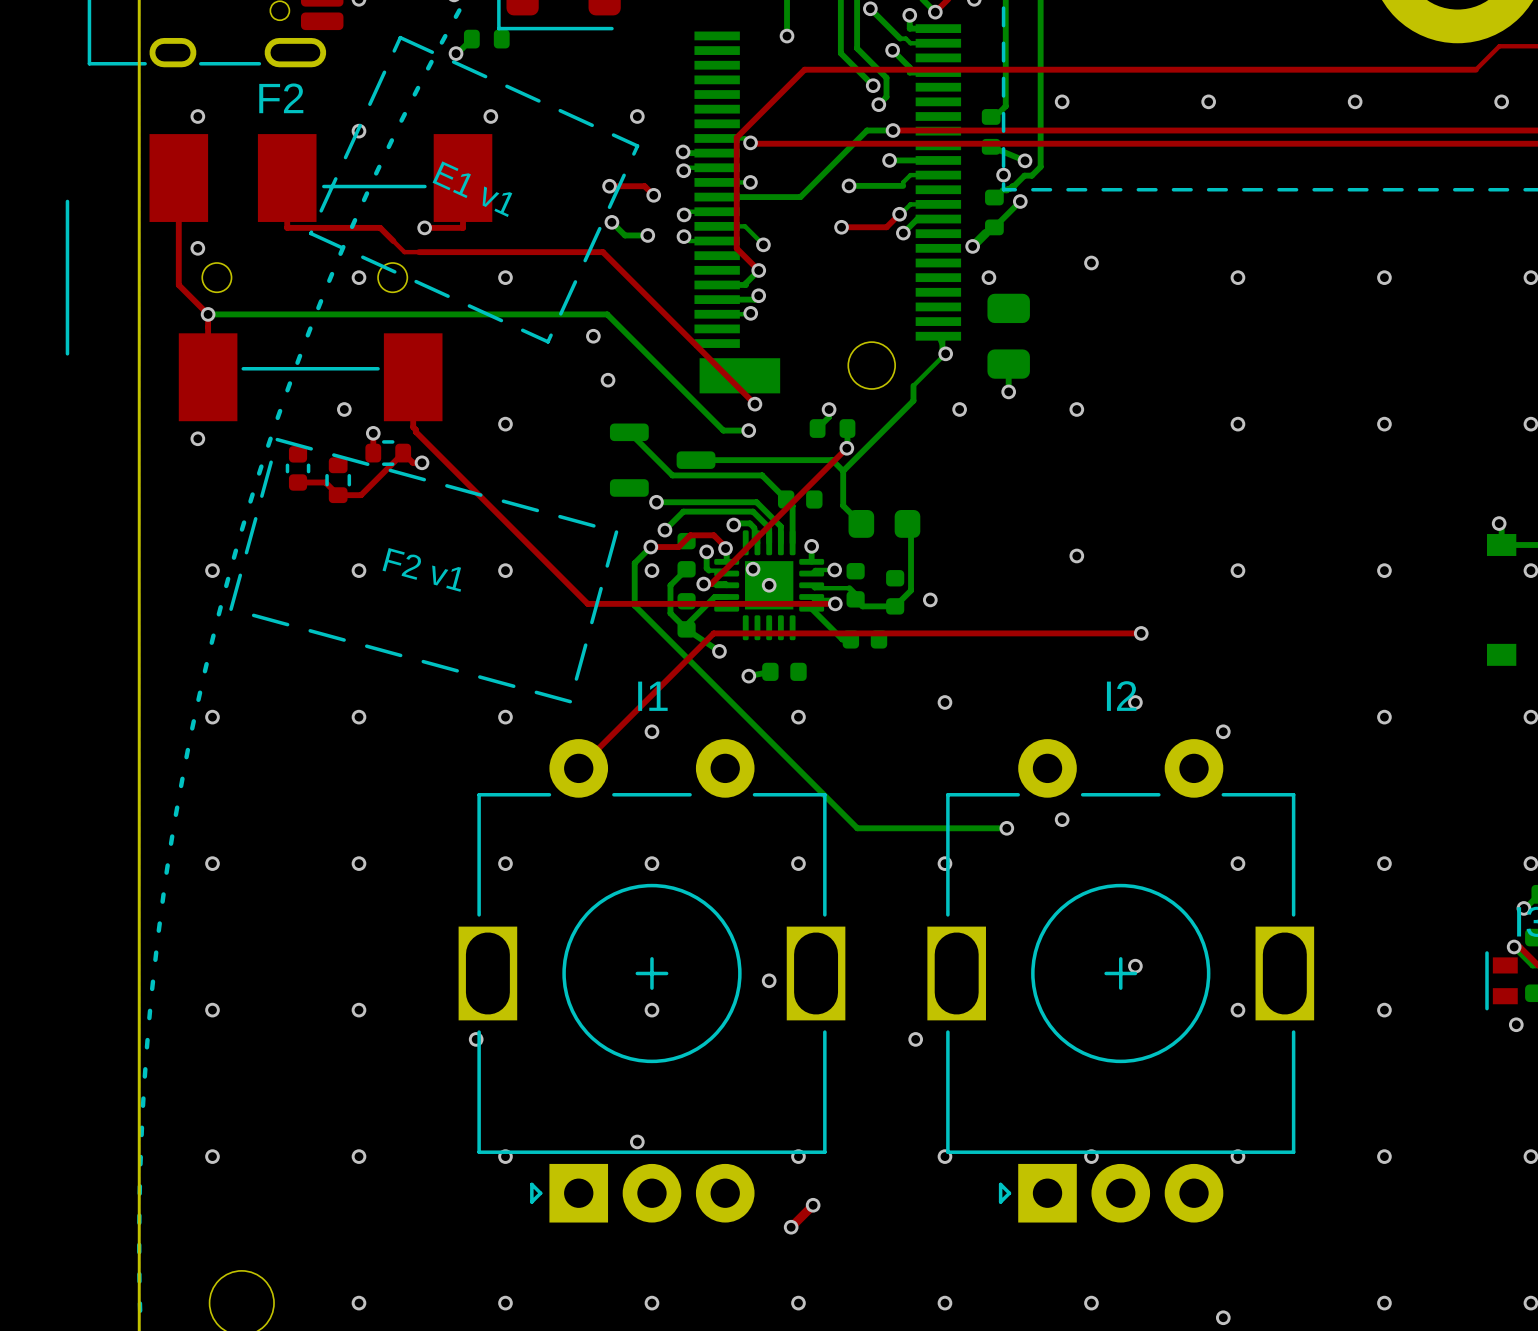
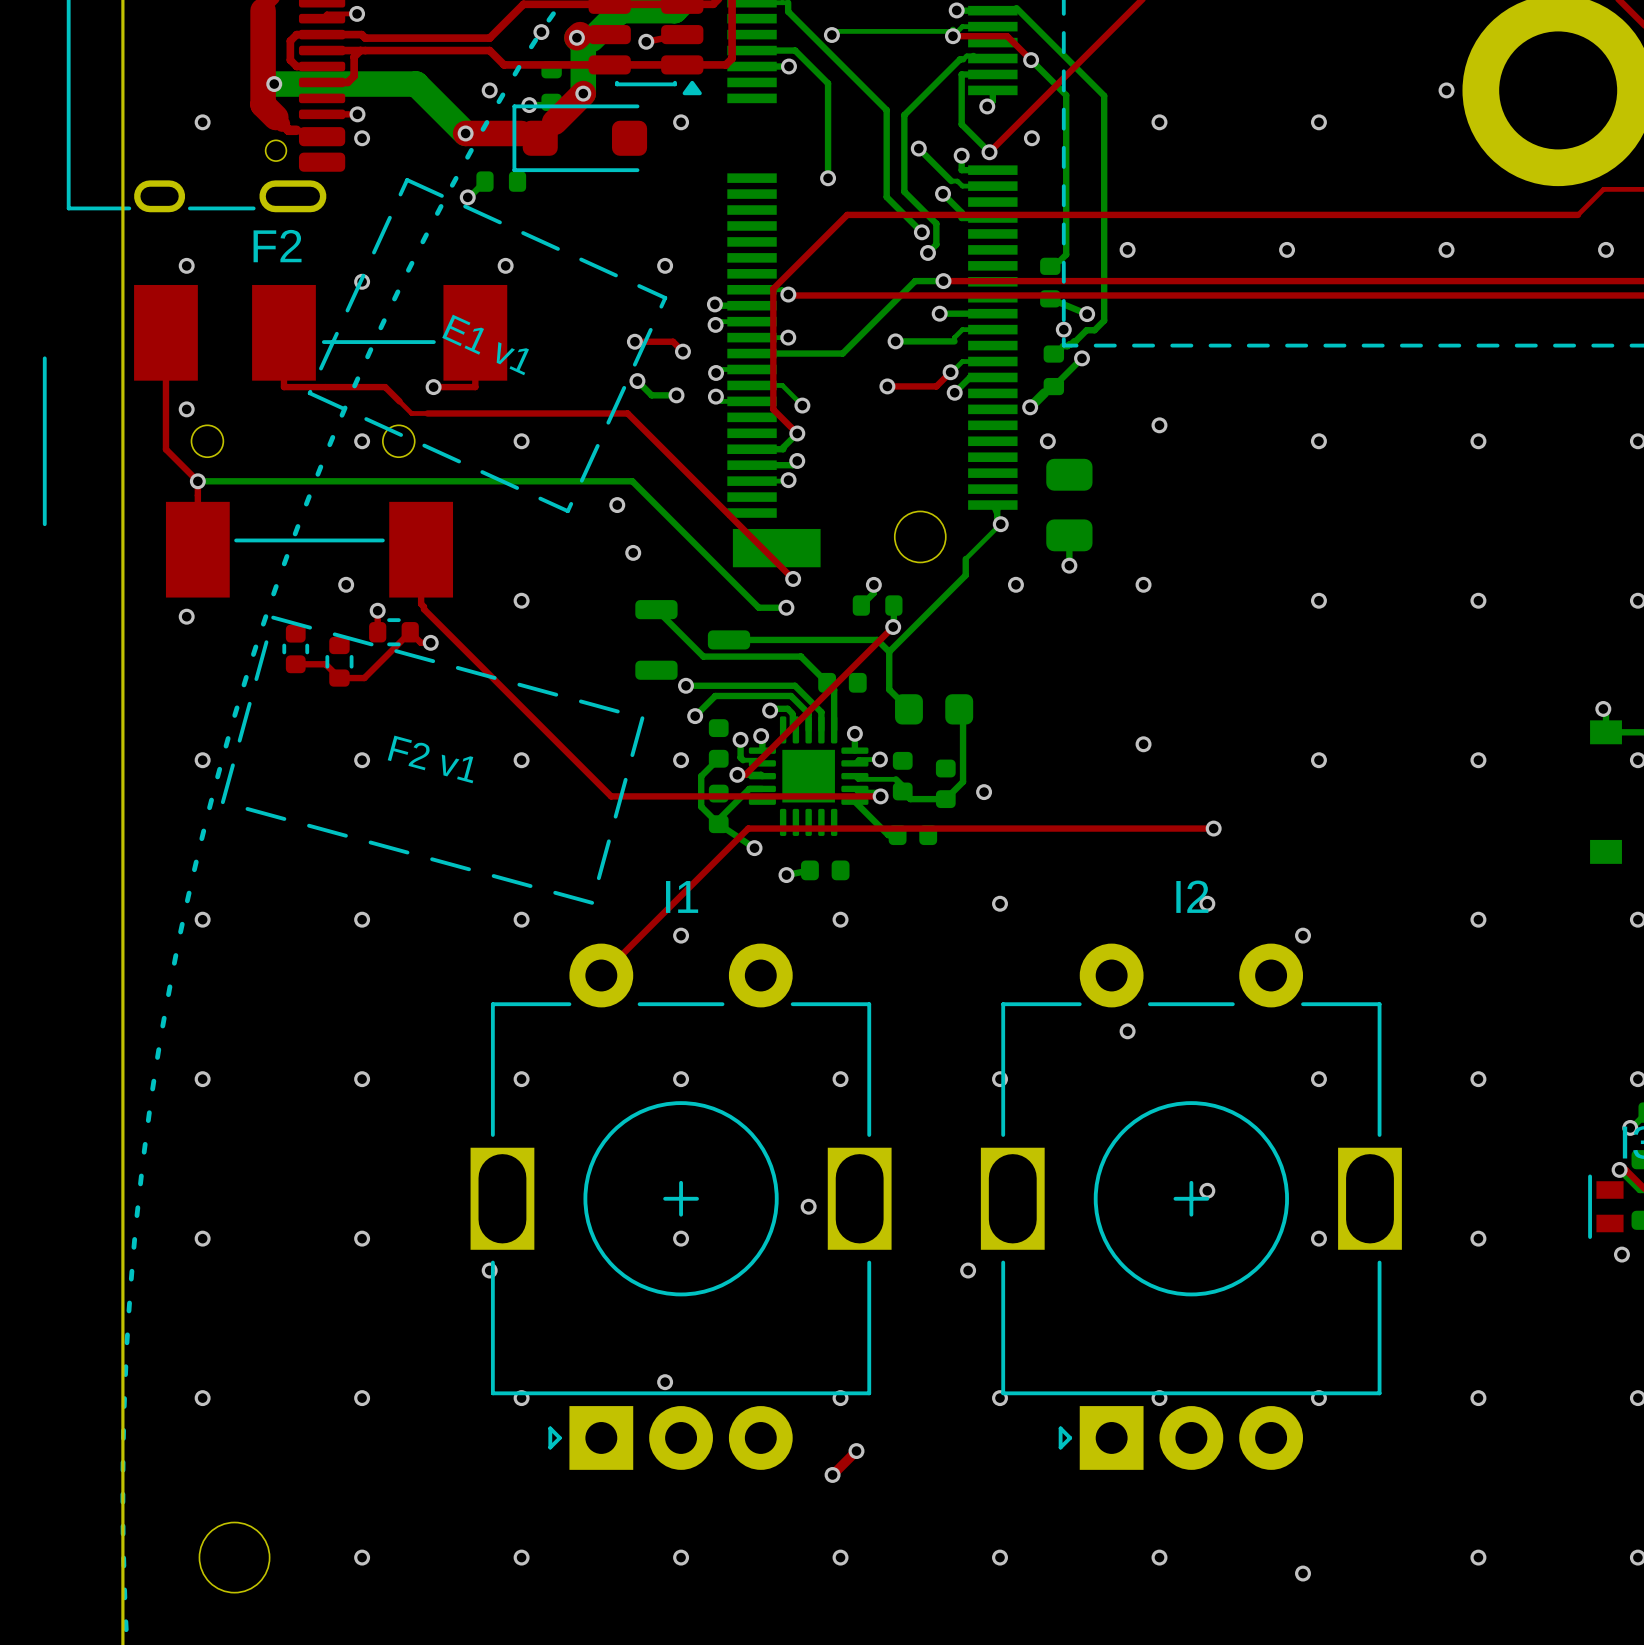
top track: (650, 547) (678, 547) (690, 535) (713, 535) (725, 548) -> none
bottom track: (650, 547) (634, 563) (634, 605) (857, 828) (1006, 828) -> none
via: (650, 547) -> none
via: (753, 569) -> none
via: (769, 585) -> none
via: (1006, 828) -> none

